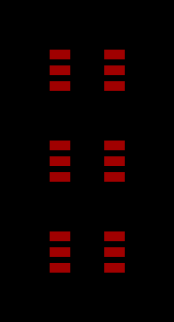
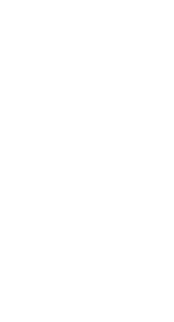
part: (87, 70) -> none
part: (87, 161) -> none
part: (87, 252) -> none

